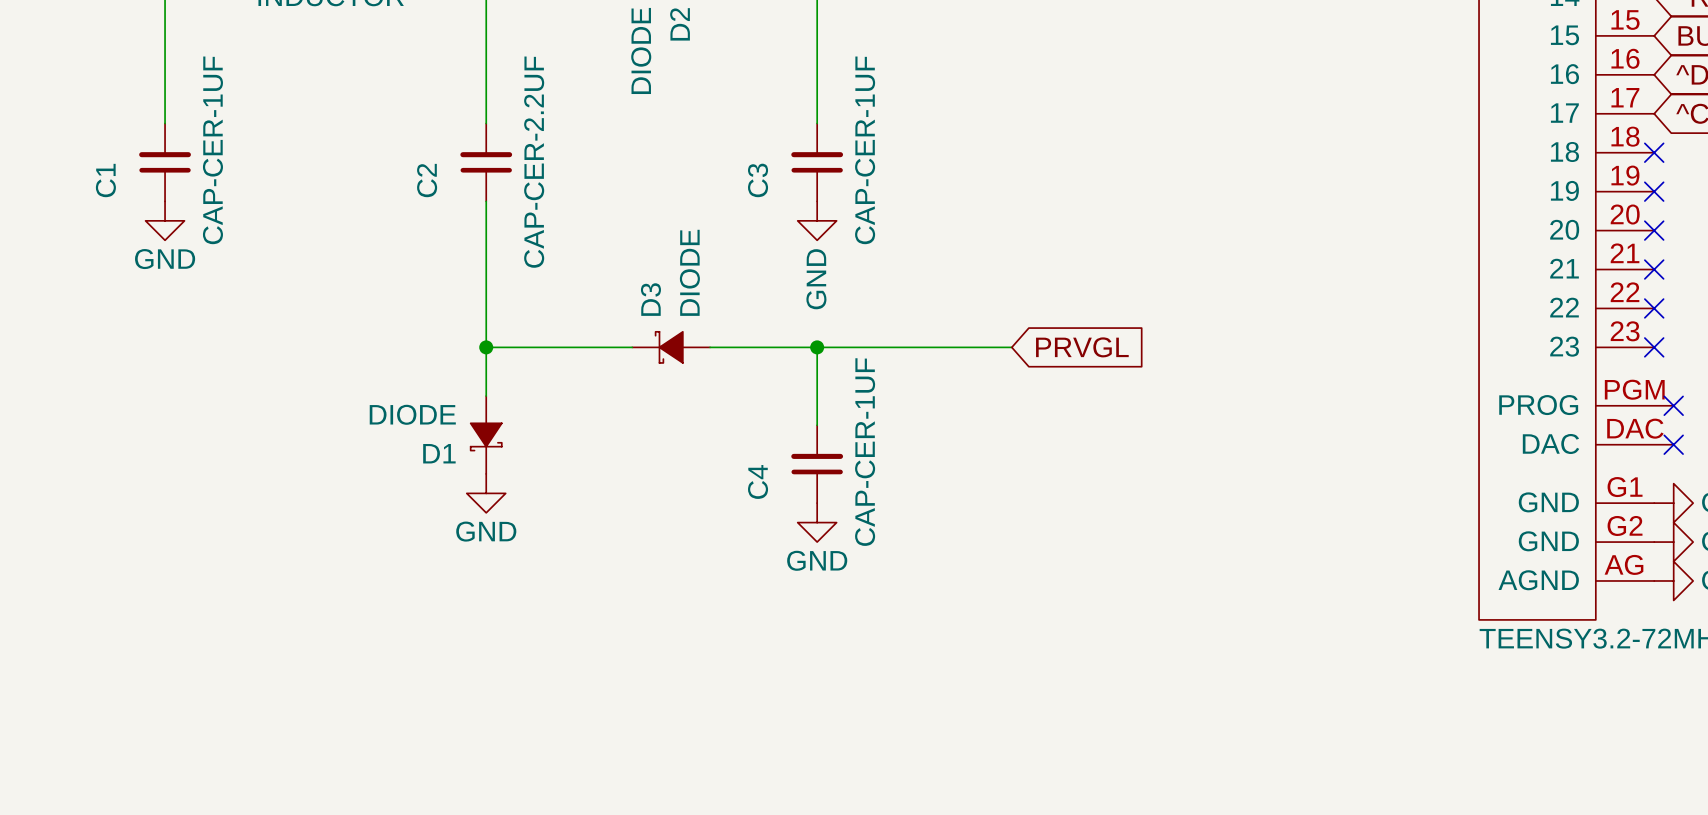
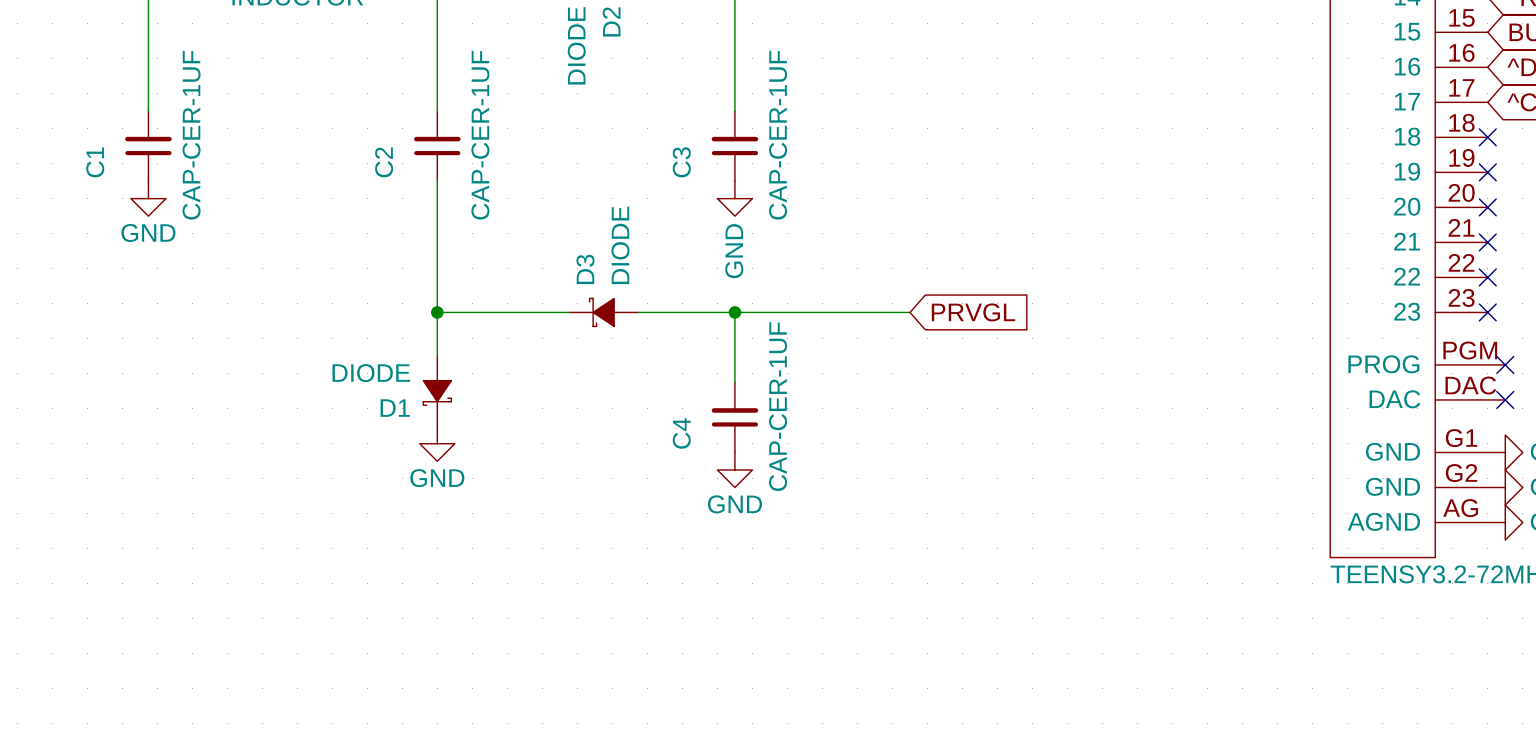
C2 value: CAP-CER-2.2UF (534, 162) -> CAP-CER-1UF (480, 135)

